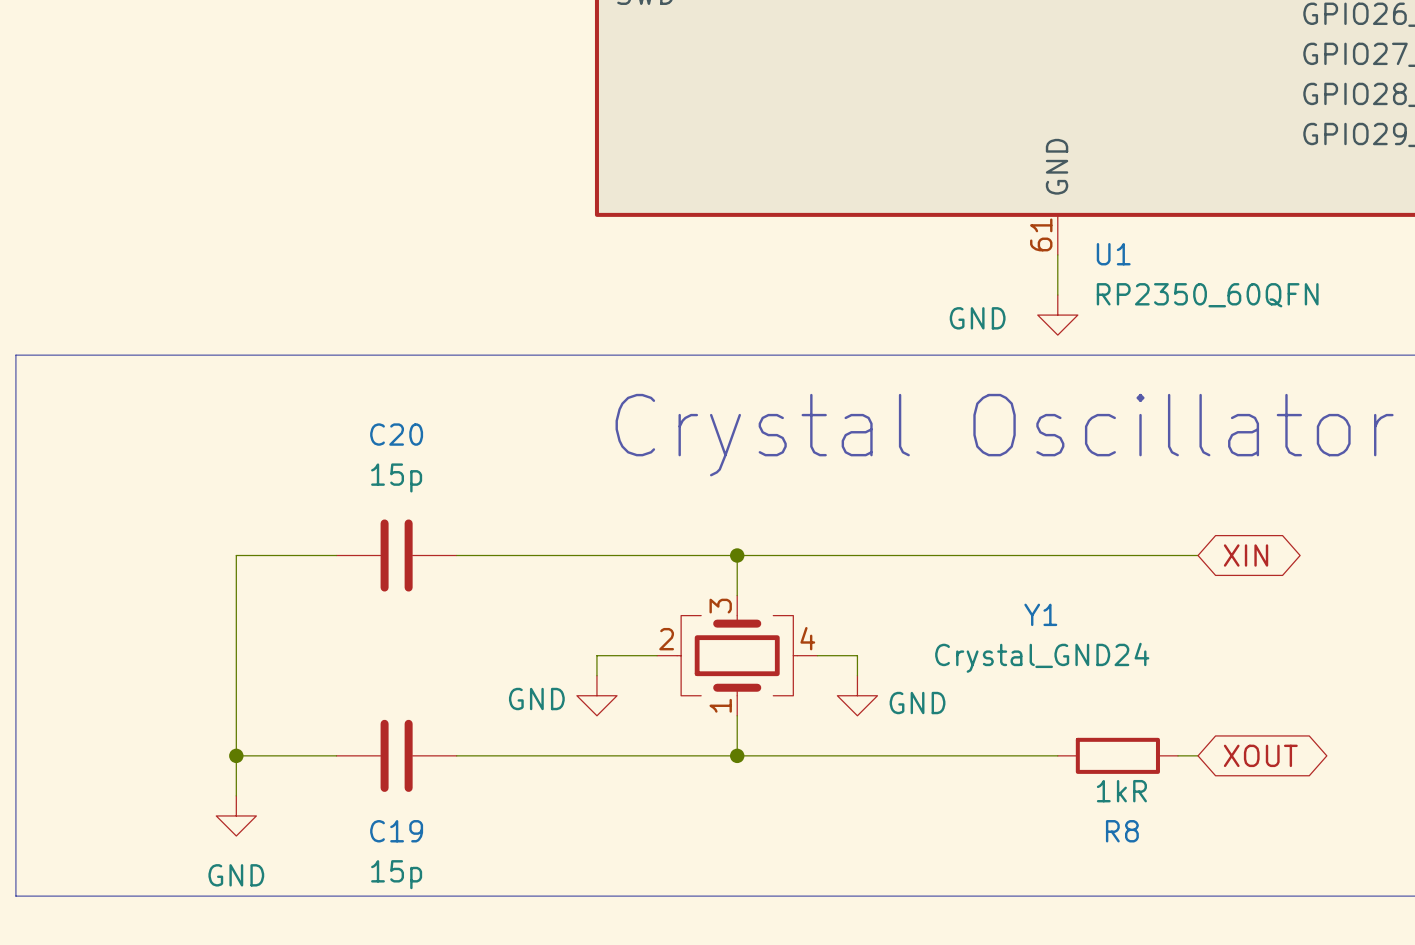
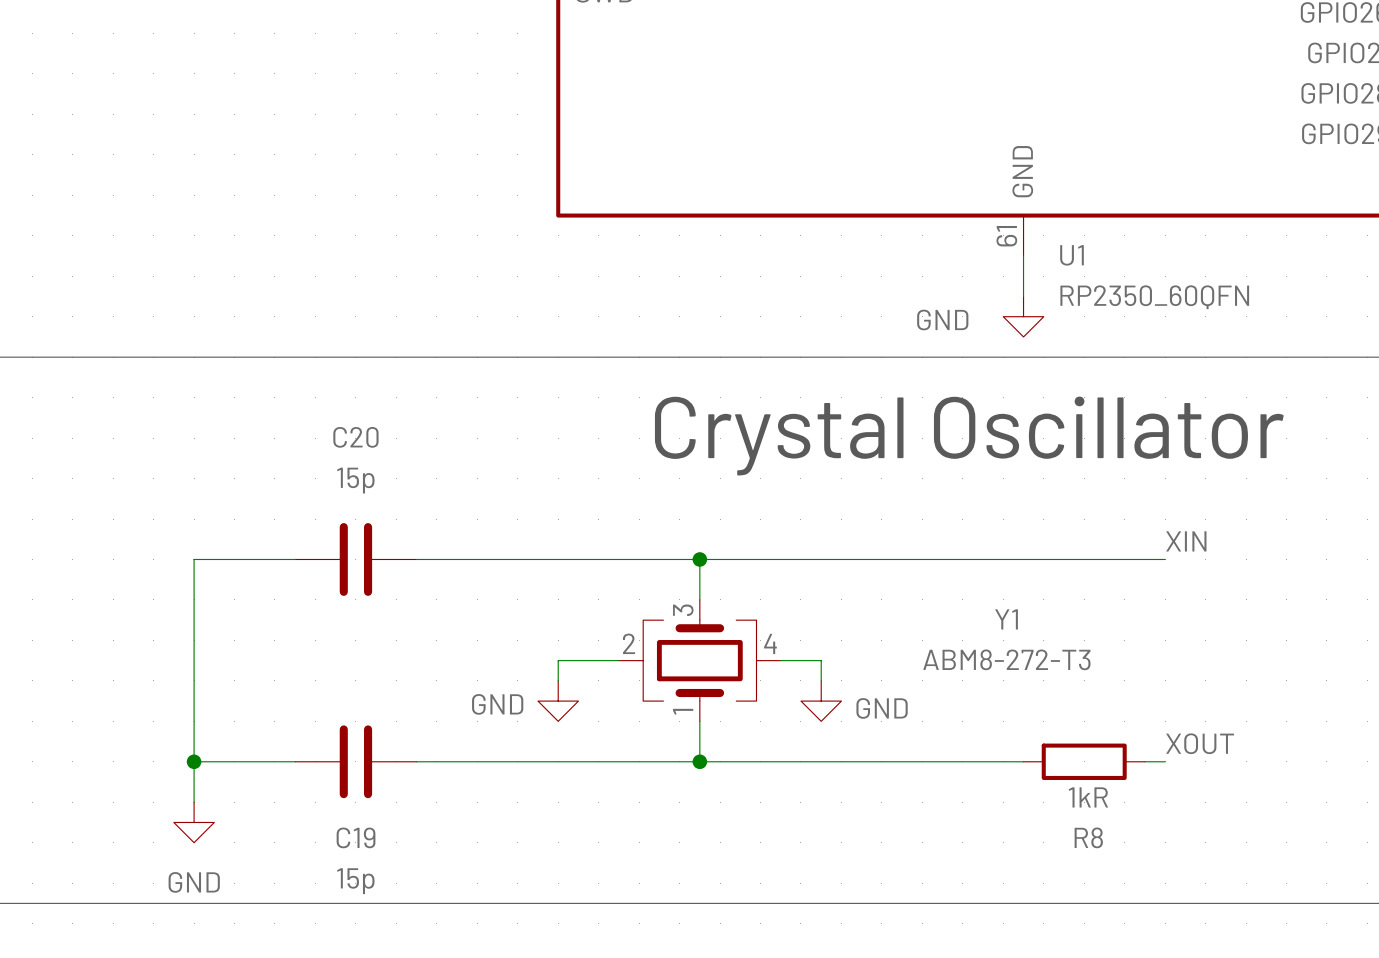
label: none -> XIN (1186, 541)
global label: XIN (1246, 555) -> none
Y1 value: Crystal_GND24 (1042, 657) -> ABM8-272-T3 (1006, 659)
label: none -> XOUT (1200, 743)
global label: XOUT (1260, 755) -> none

